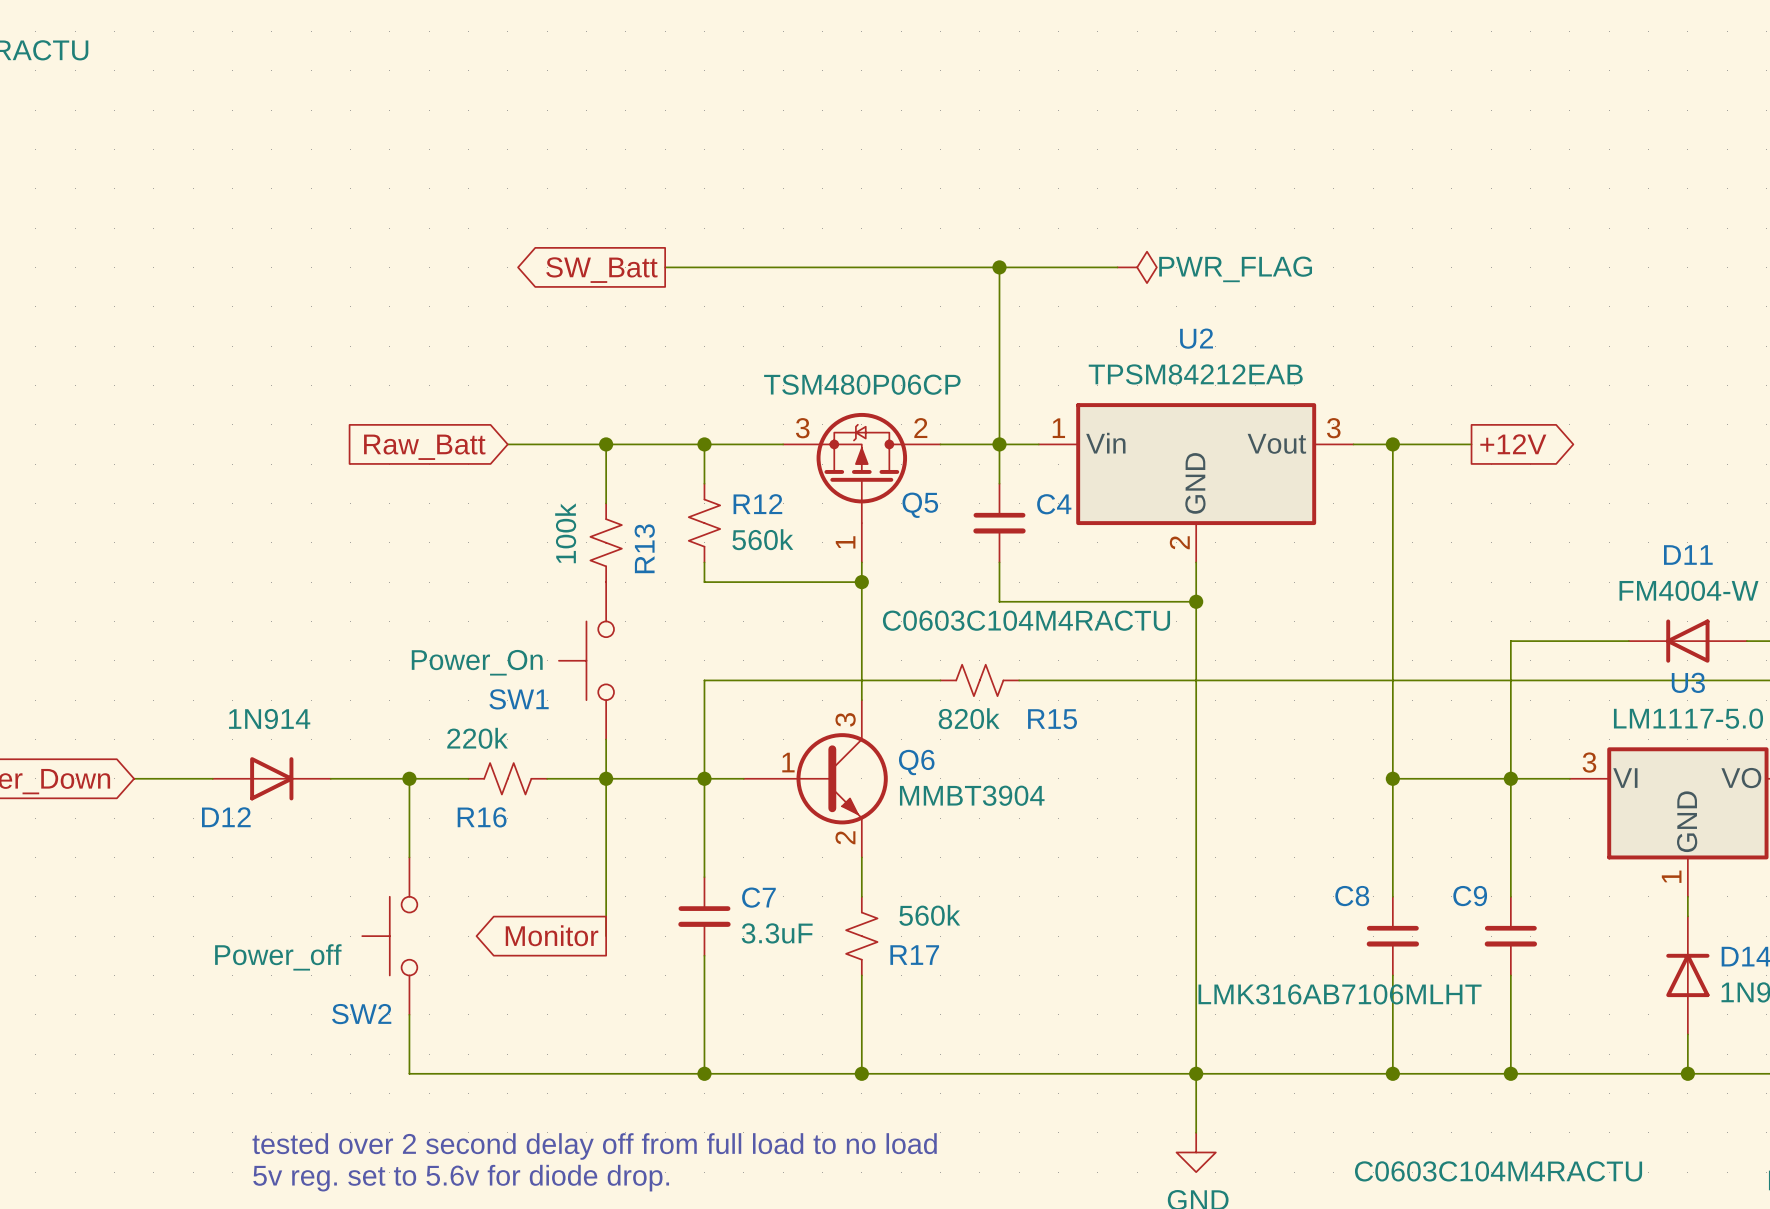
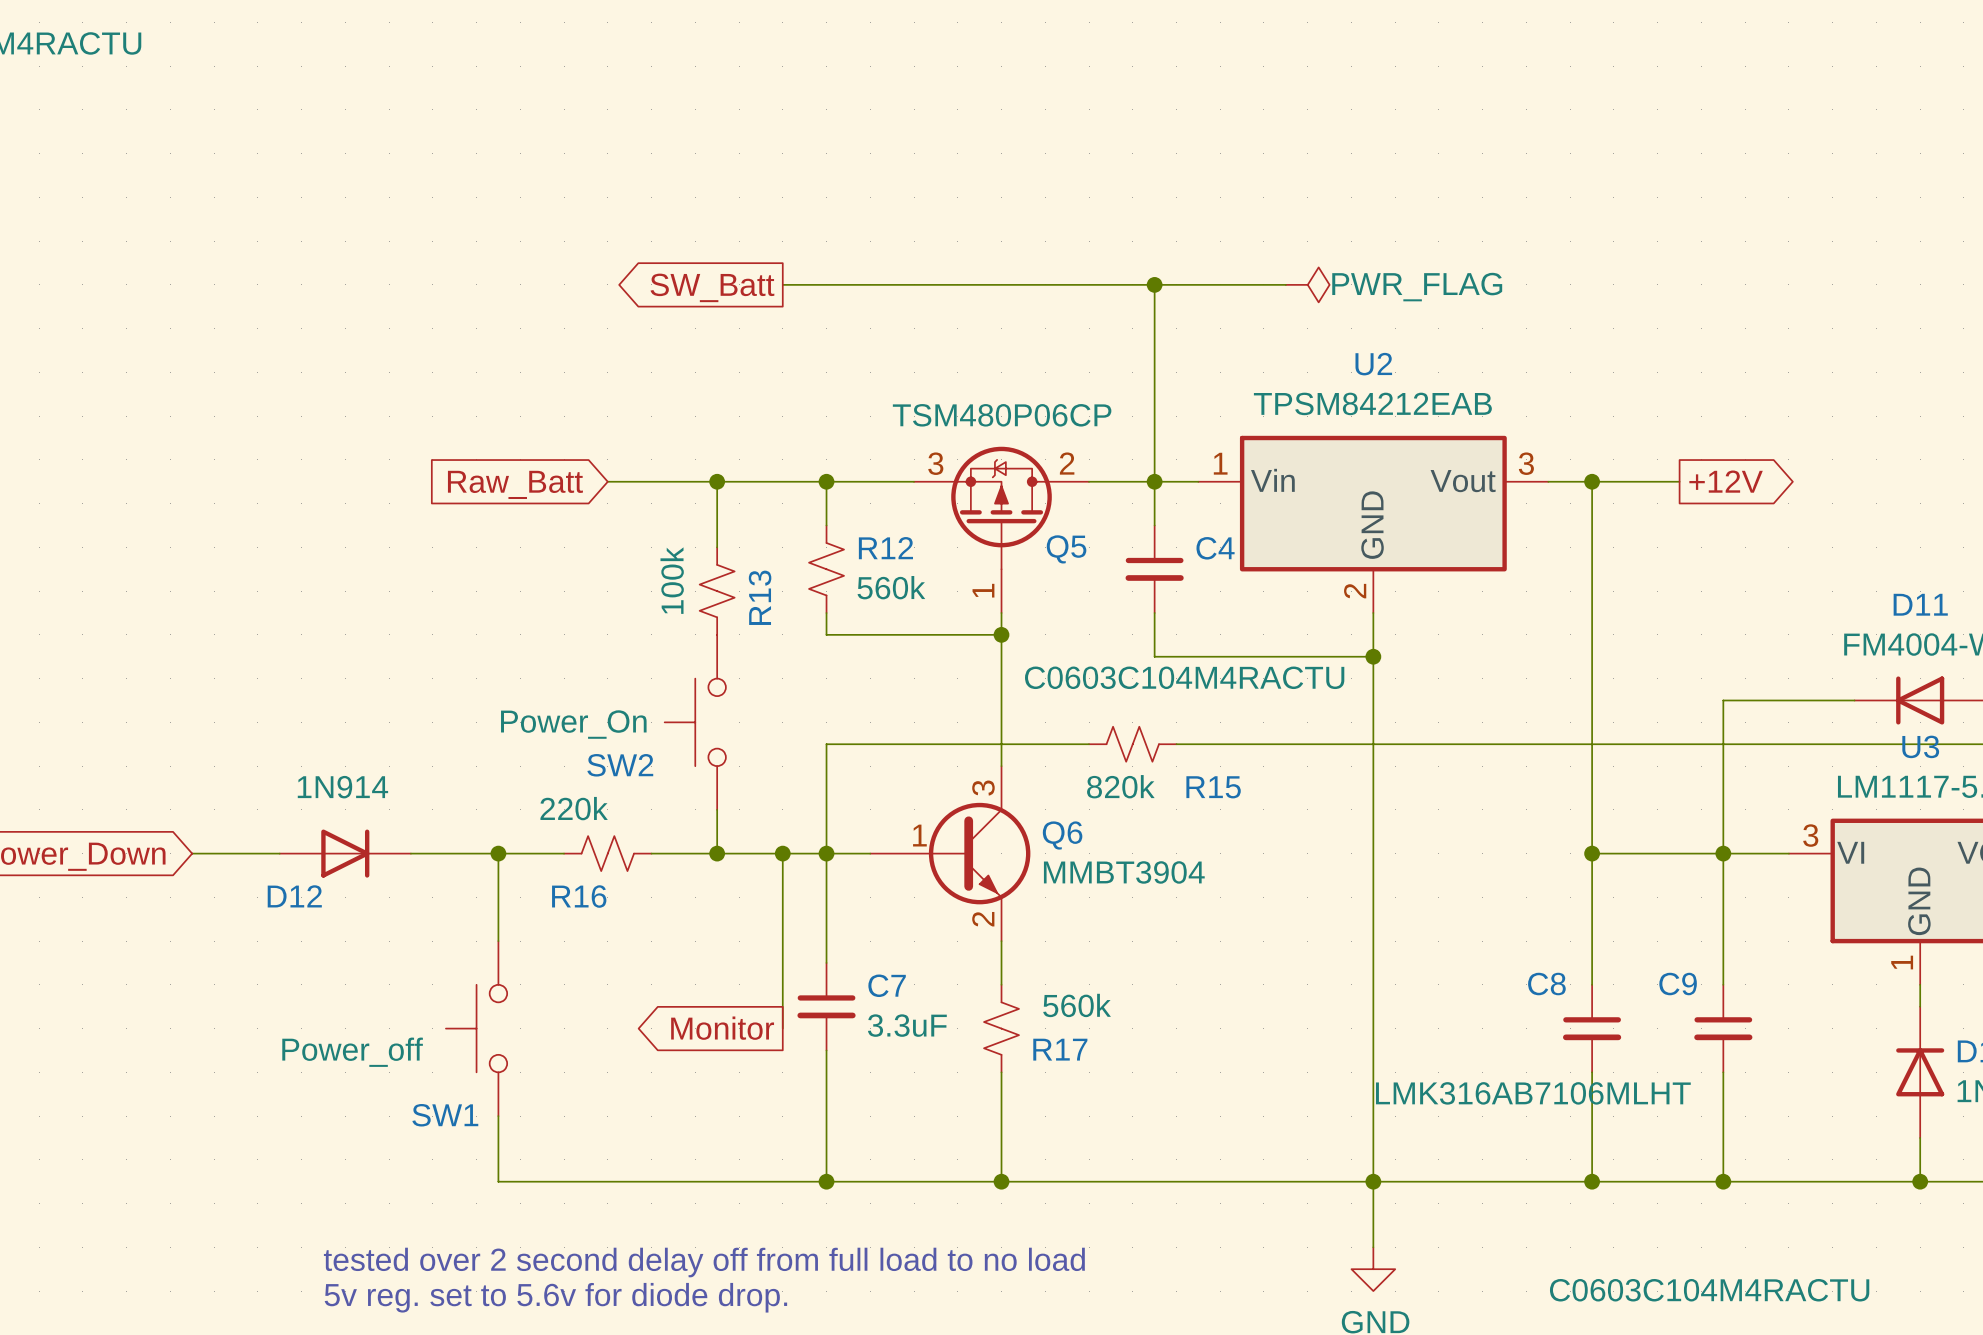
SW1 name: SW1 (519, 699) -> SW2 (620, 765)
wire: (606, 778) (606, 936) -> (782, 853) (782, 1028)
junction: none -> (782, 853)
global label position: Monitor (552, 935) -> Monitor (722, 1028)
SW2 name: SW2 (361, 1014) -> SW1 (445, 1115)

